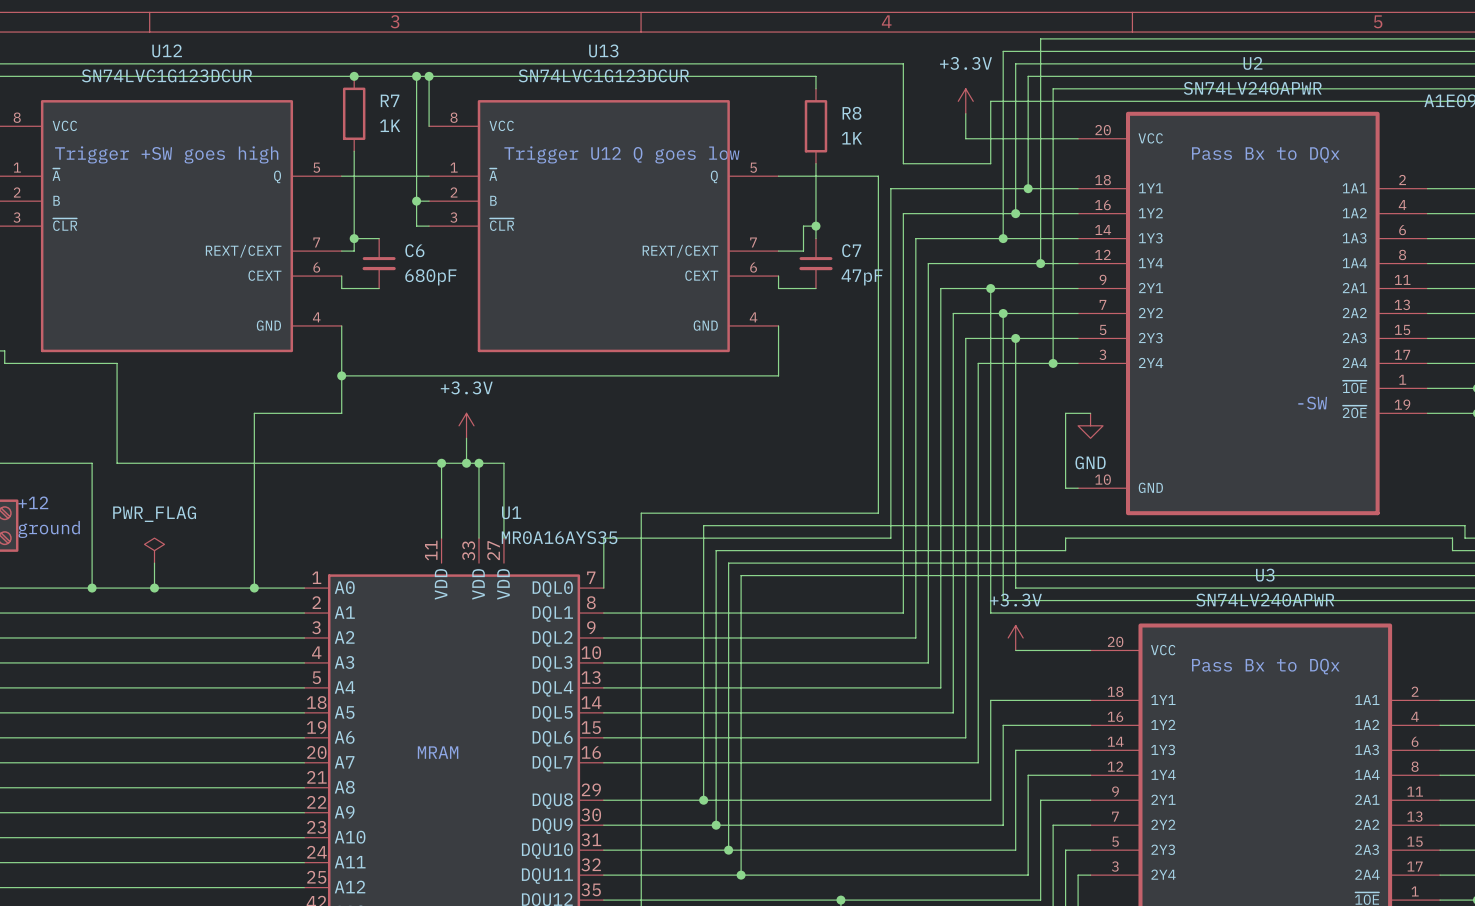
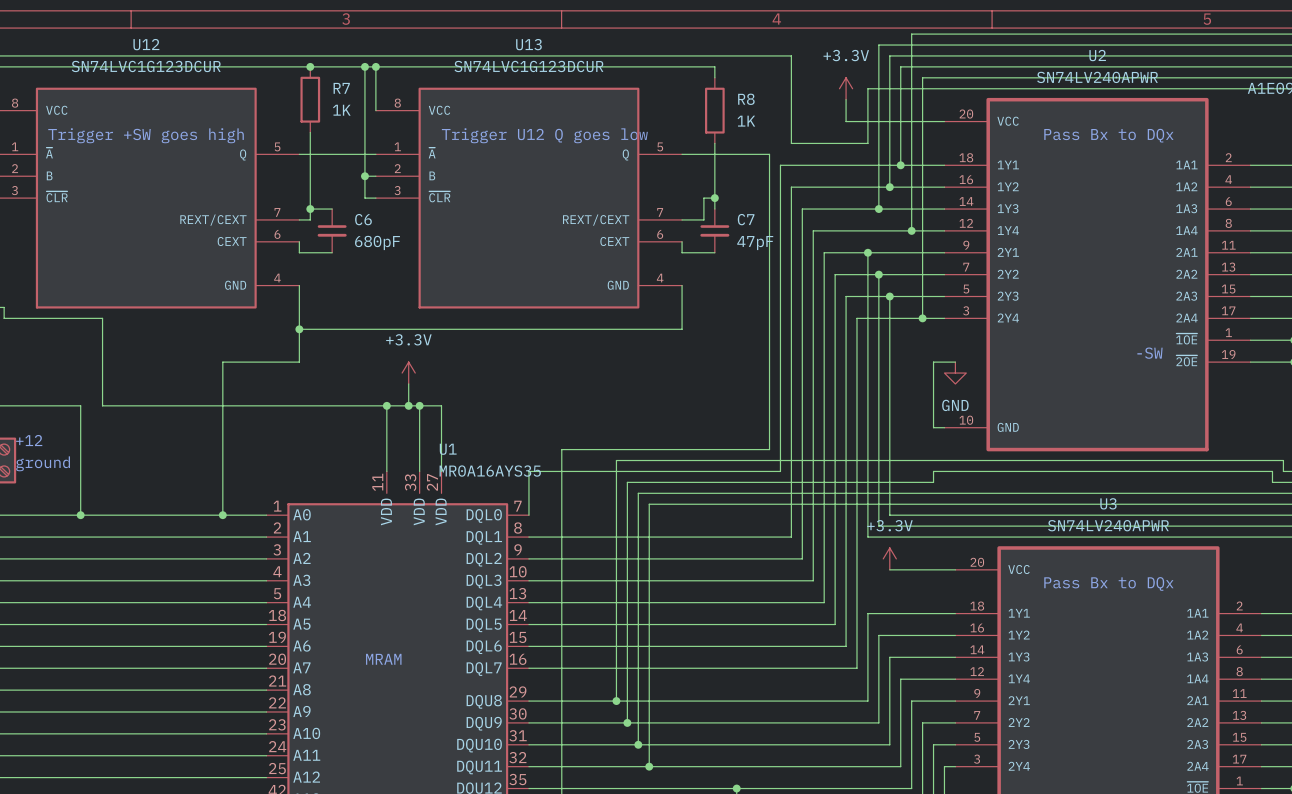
power symbol: PWR_FLAG (154, 550) -> none
wire: (154, 563) (154, 588) -> none
junction: (154, 588) -> none

